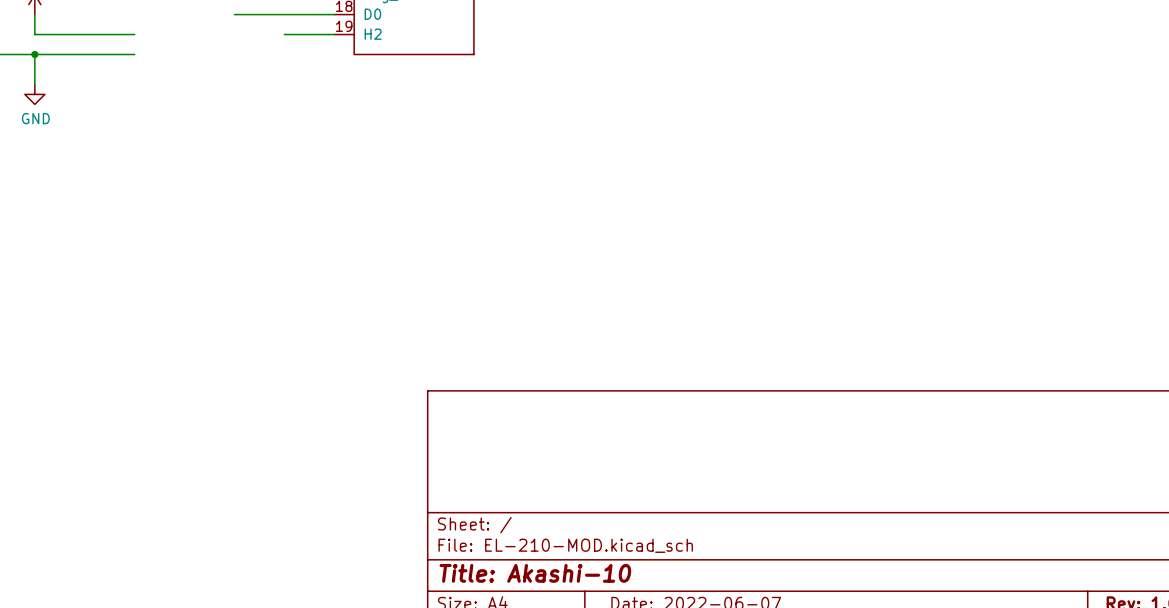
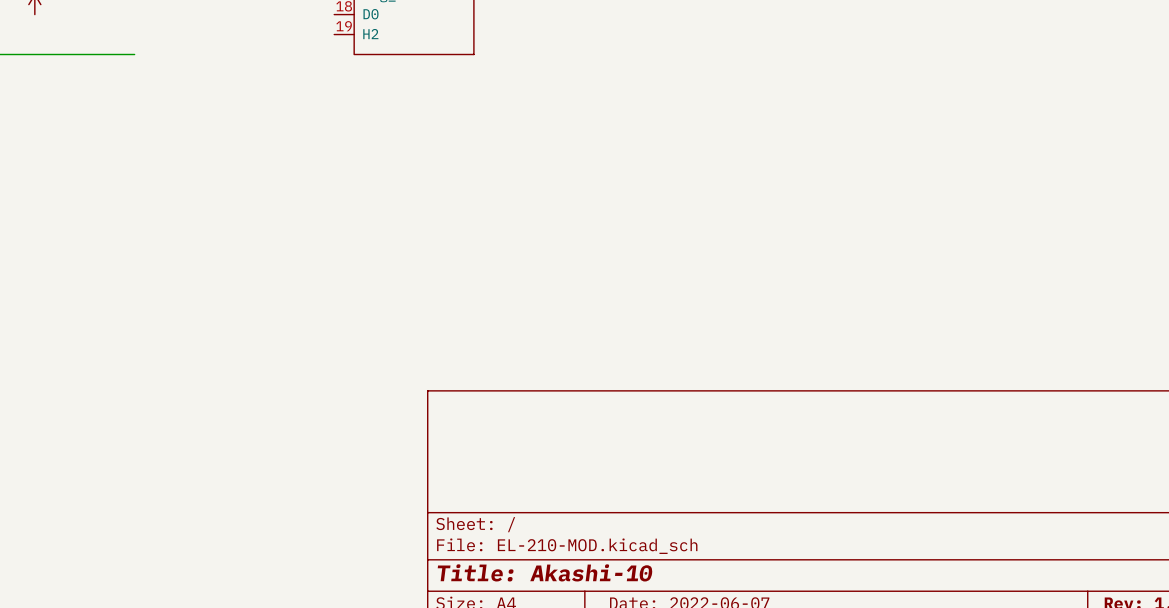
wire: (34, 14) (34, 34) (134, 34) -> none
wire: (234, 14) (334, 14) -> none
wire: (284, 34) (334, 34) -> none
wire: (34, 54) (34, 84) -> none
junction: (34, 54) -> none
power symbol: GND (34, 94) -> none

